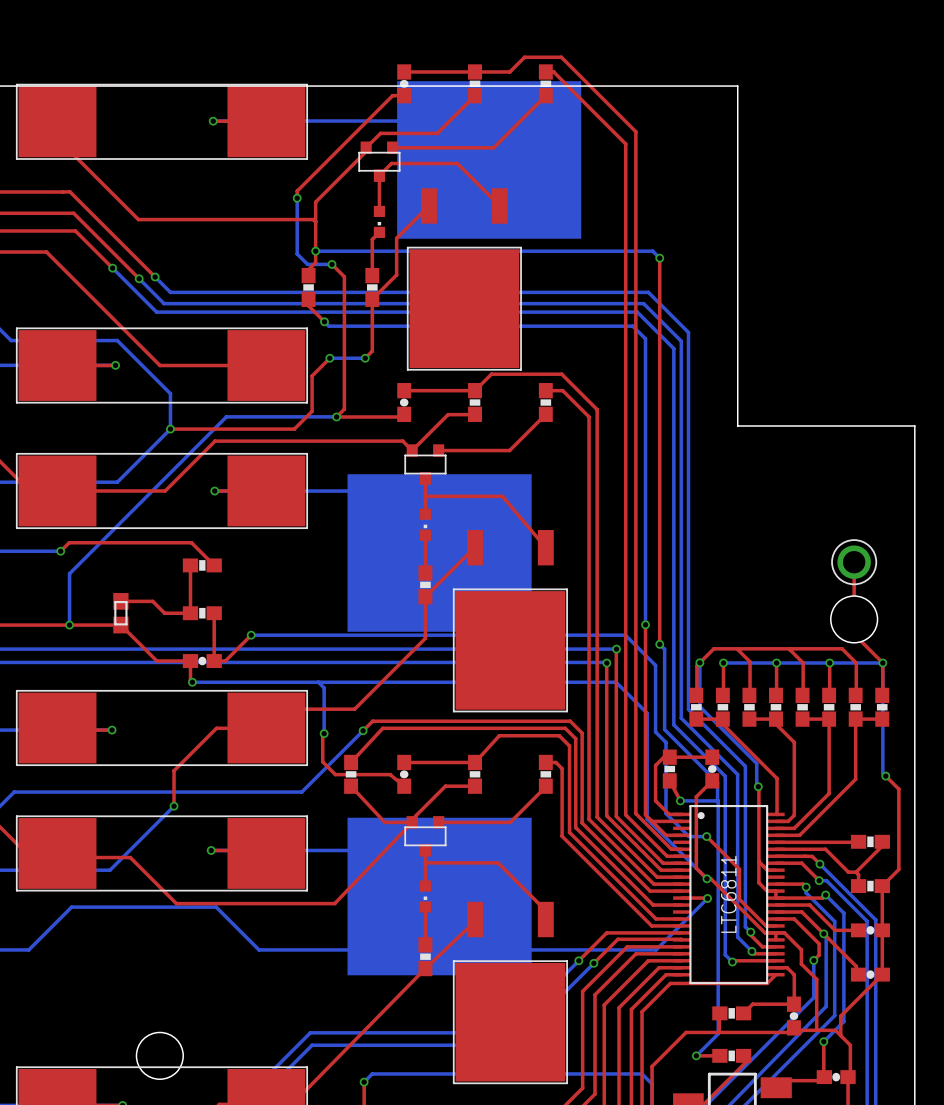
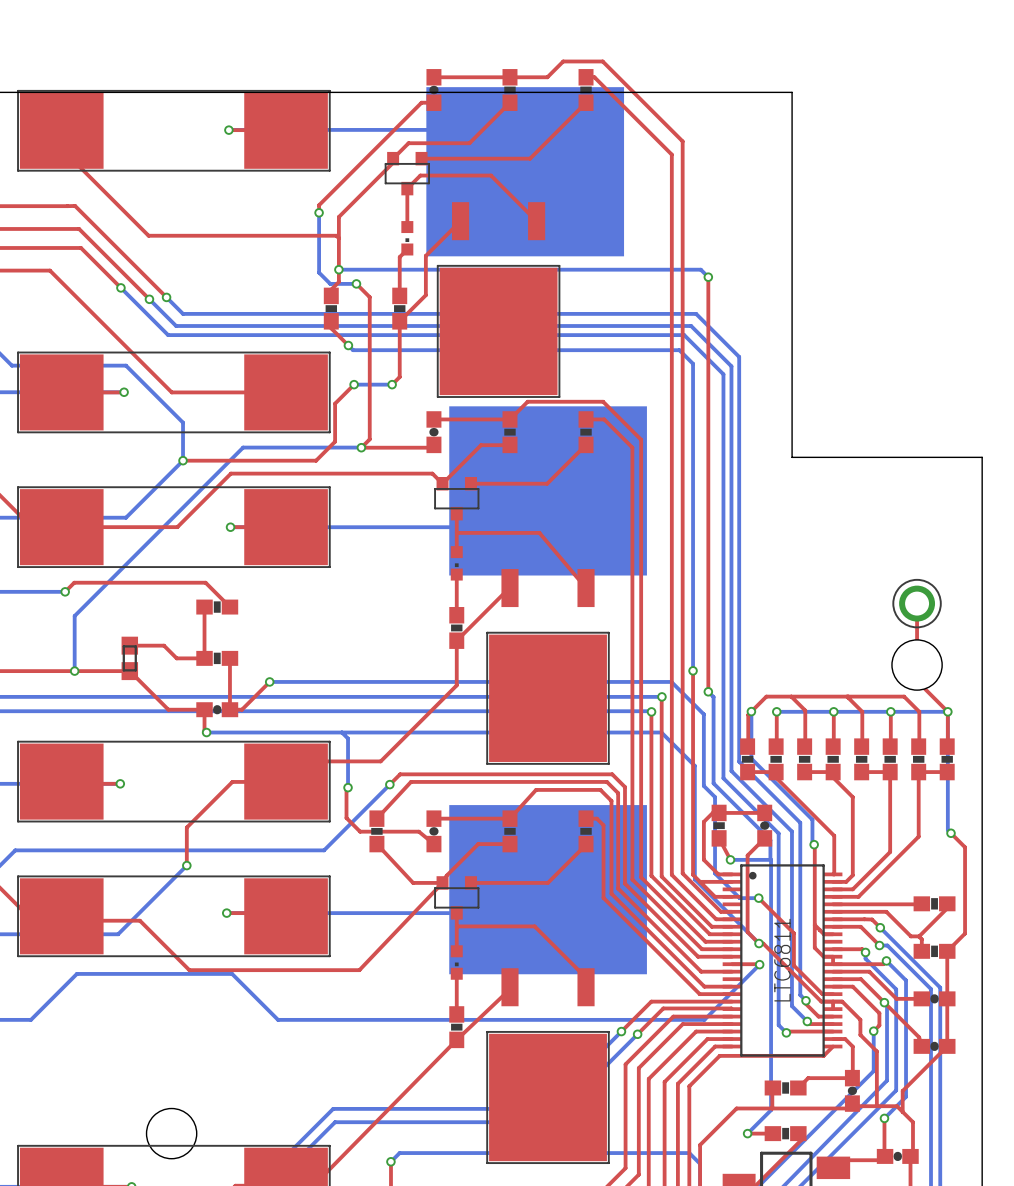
part position: (439, 553) -> (548, 490)
part position: (439, 896) -> (548, 889)

